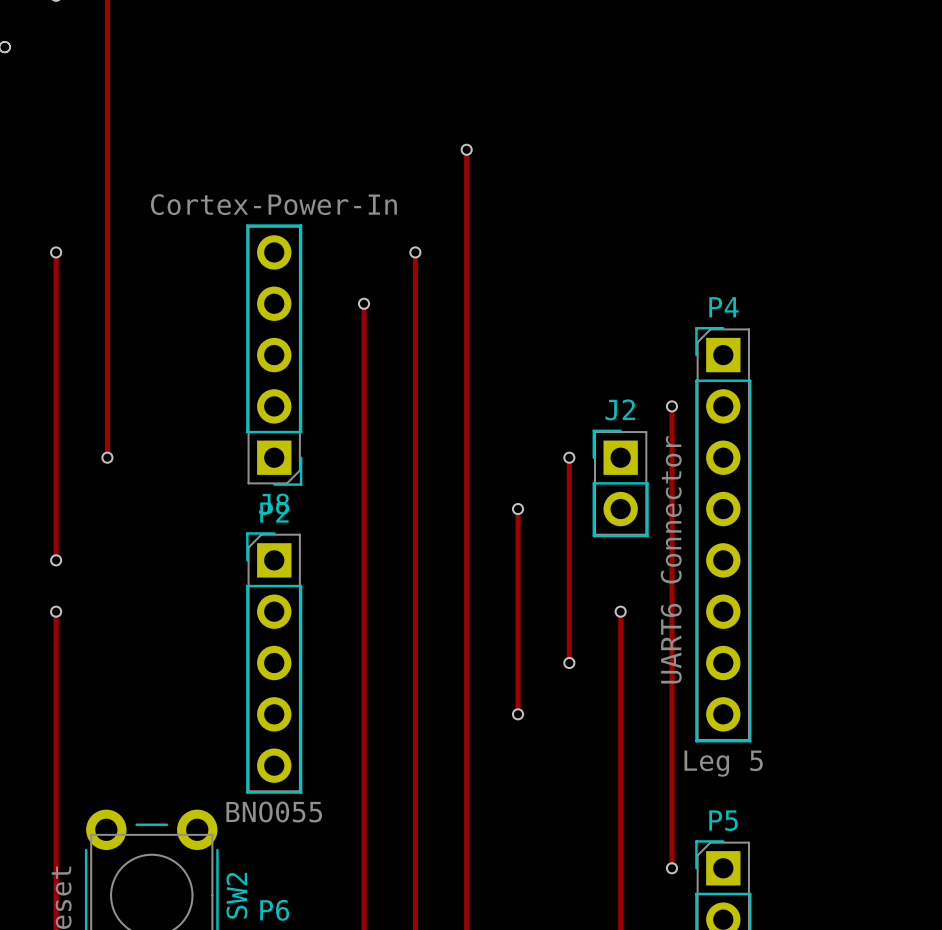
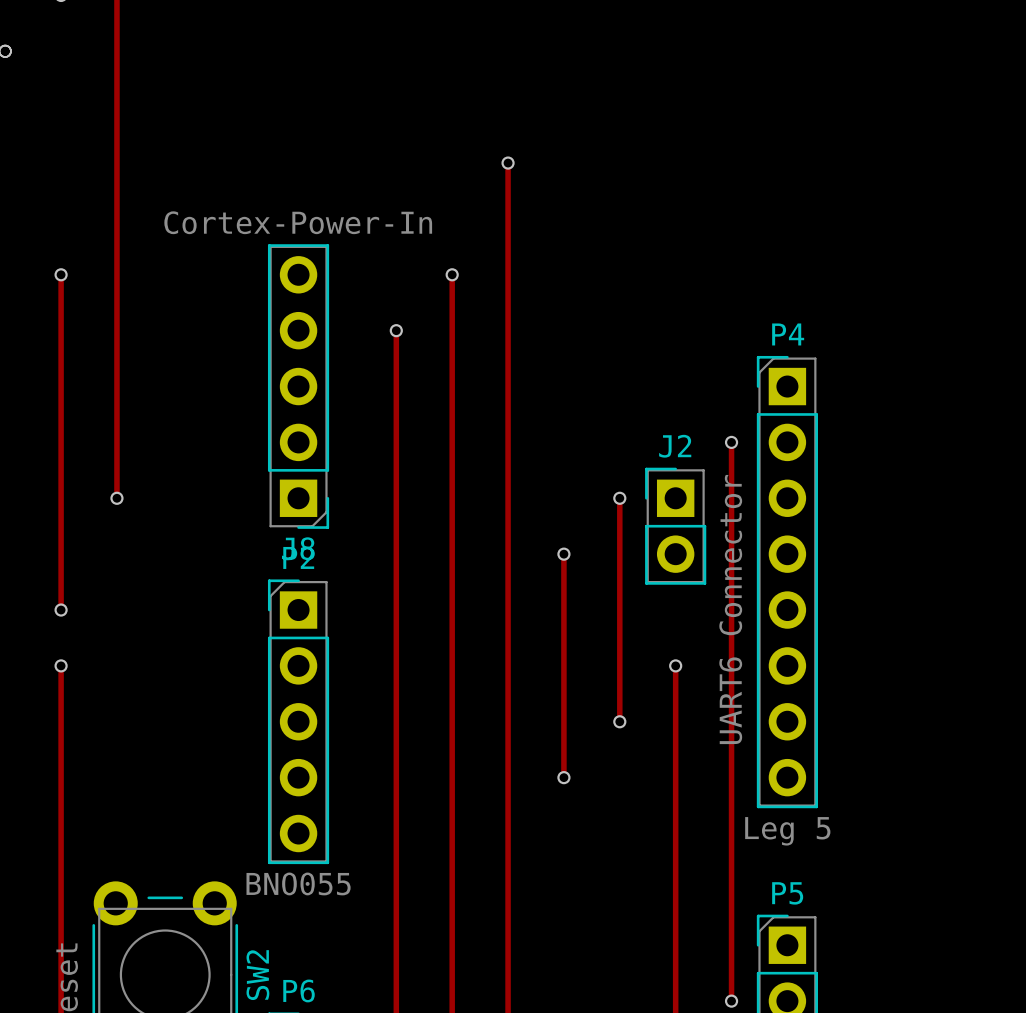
track: none -> (731, 945) (731, 1001)
via position: (671, 868) -> (731, 1001)

